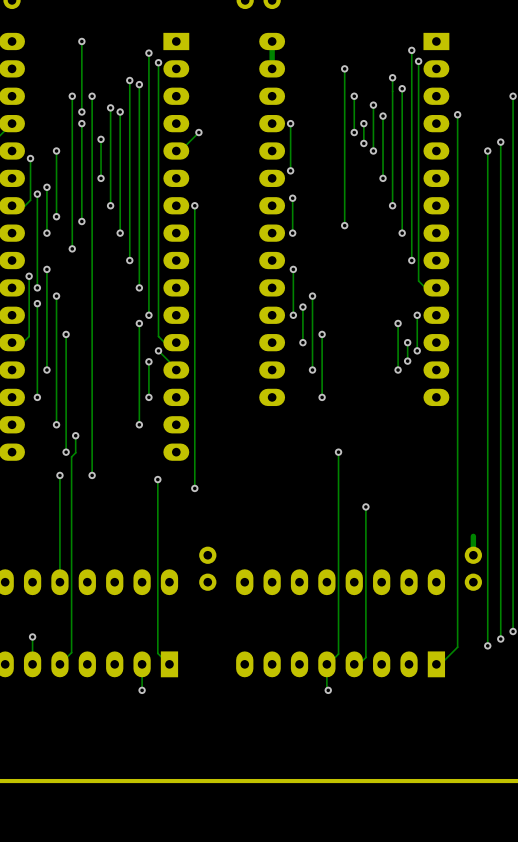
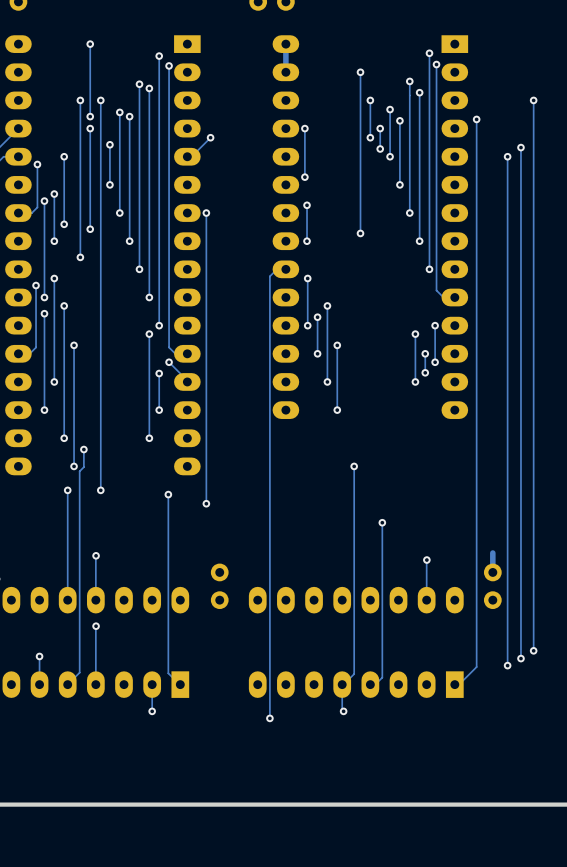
track: none -> (285, 269) (276, 269) (269, 276) (269, 718)
track: none -> (96, 555) (95, 600)
via: none -> (96, 555)
track: none -> (426, 560) (426, 600)
via: none -> (426, 560)
track: none -> (96, 626) (95, 684)
via: none -> (96, 626)
via: none -> (269, 718)

